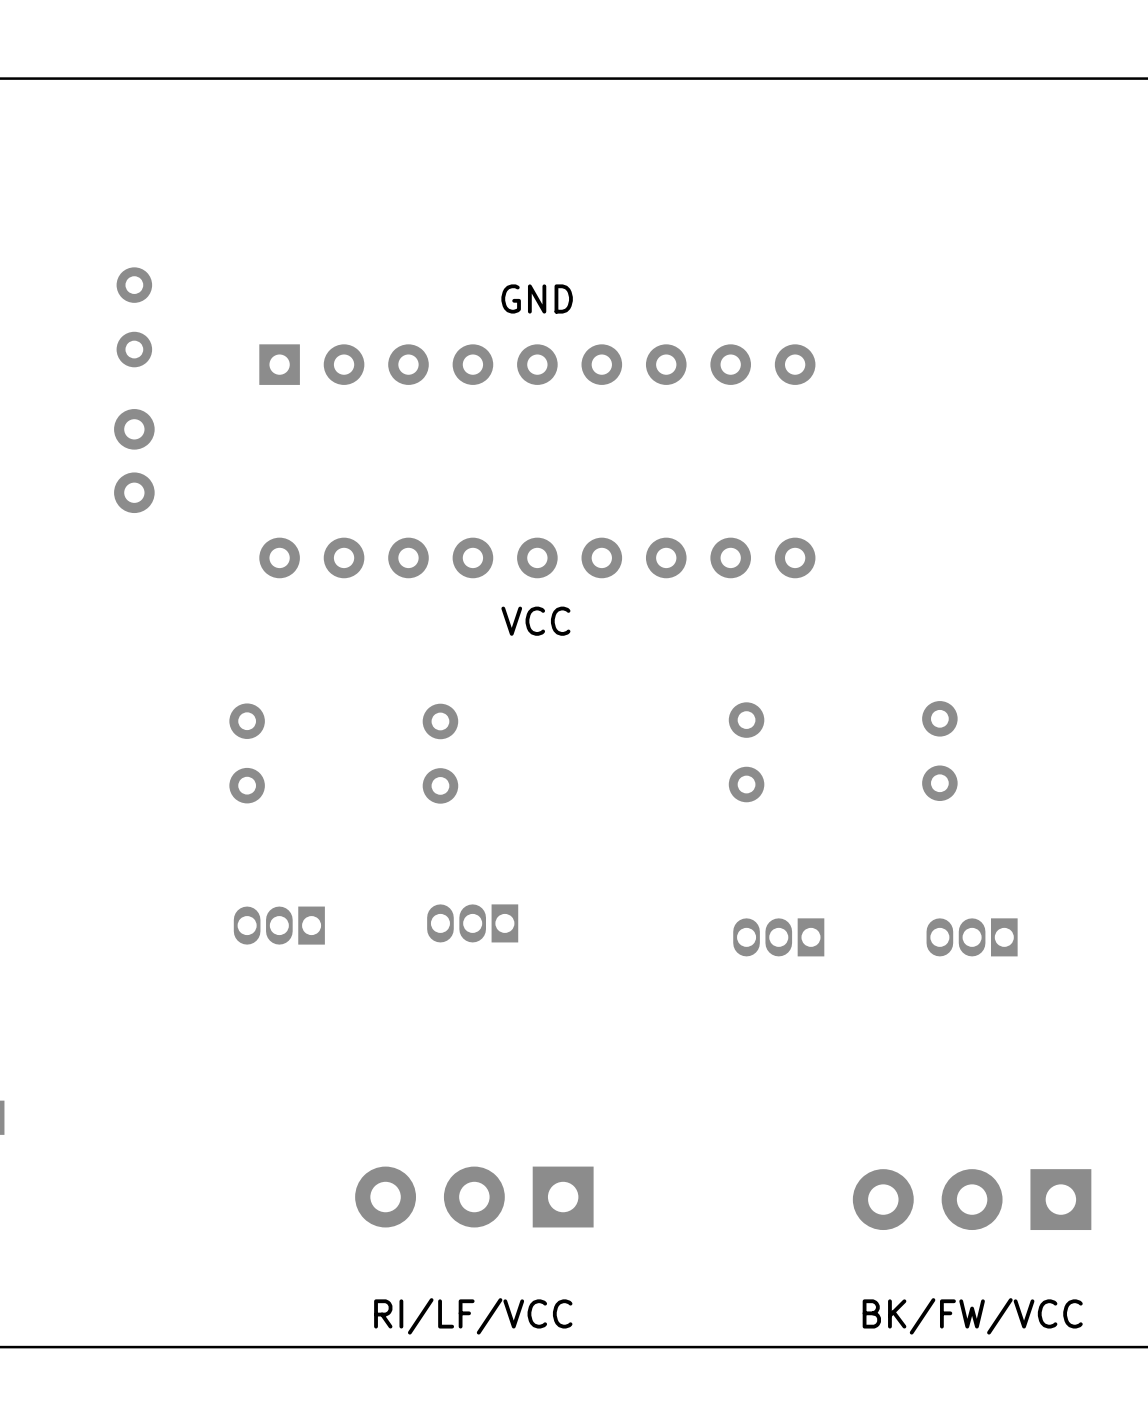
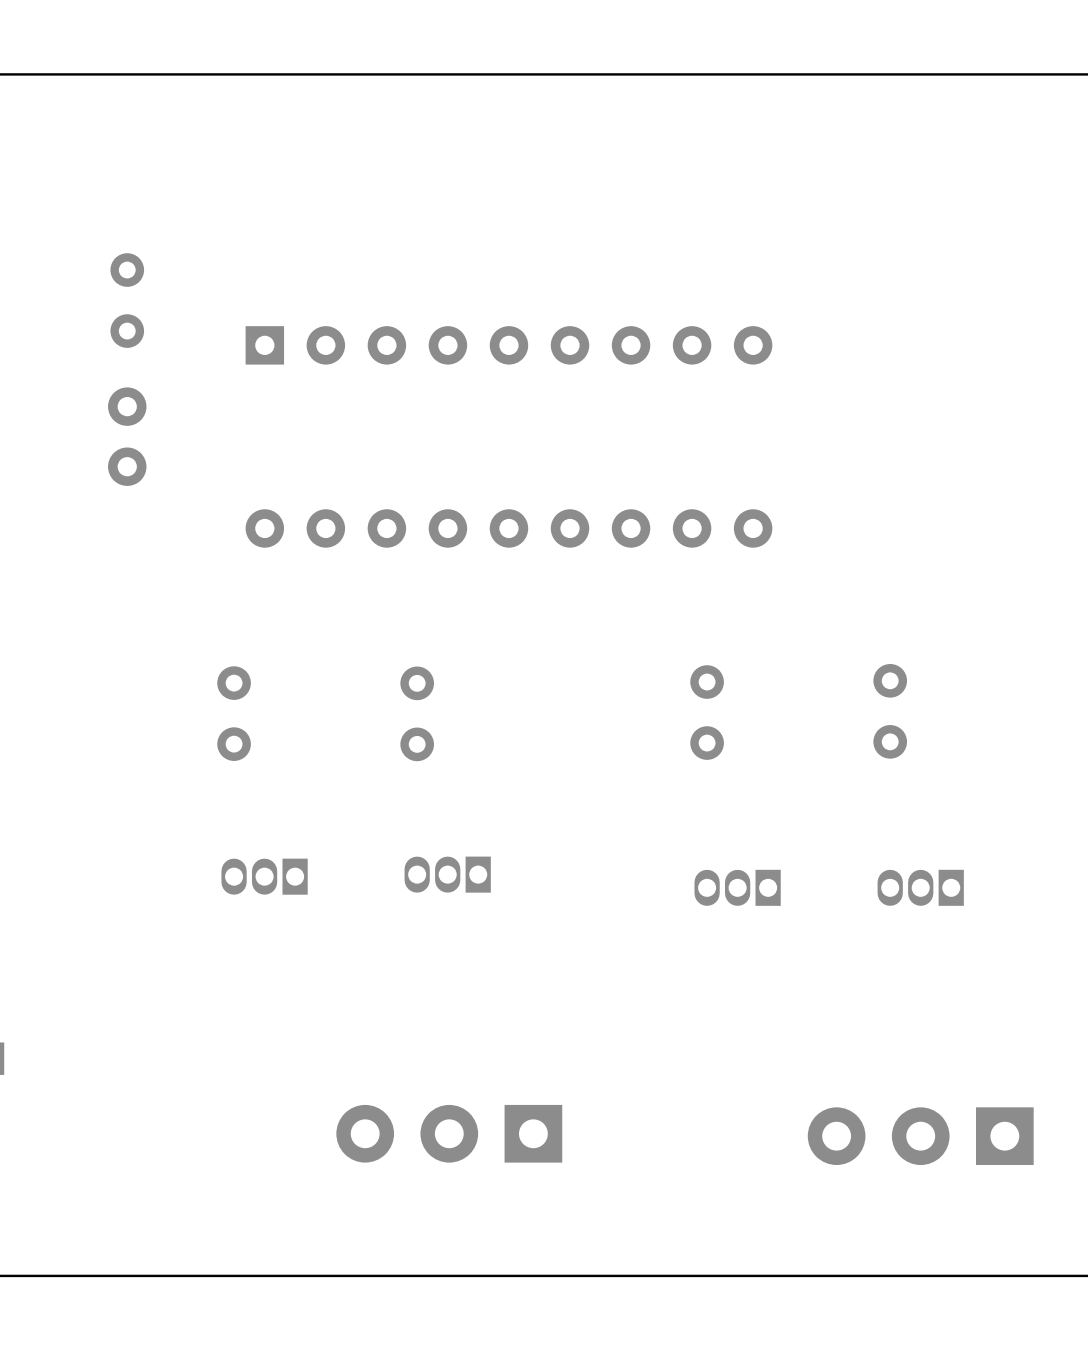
text: GND (537, 298) -> none
text: VCC (535, 621) -> none
text: RI/LF/VCC (473, 1316) -> none
text: BK/FW/VCC (972, 1316) -> none

